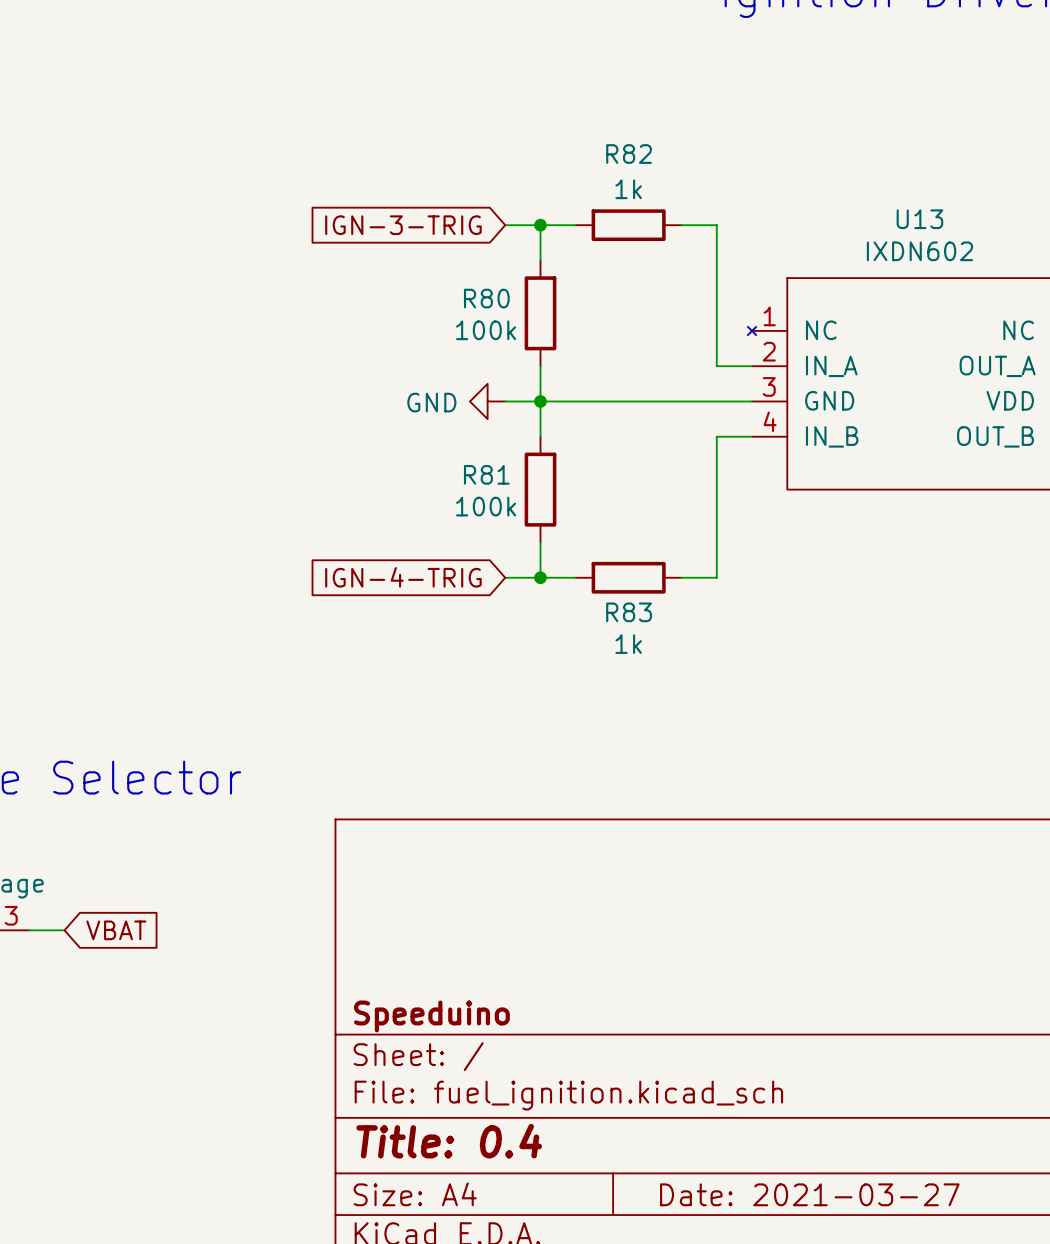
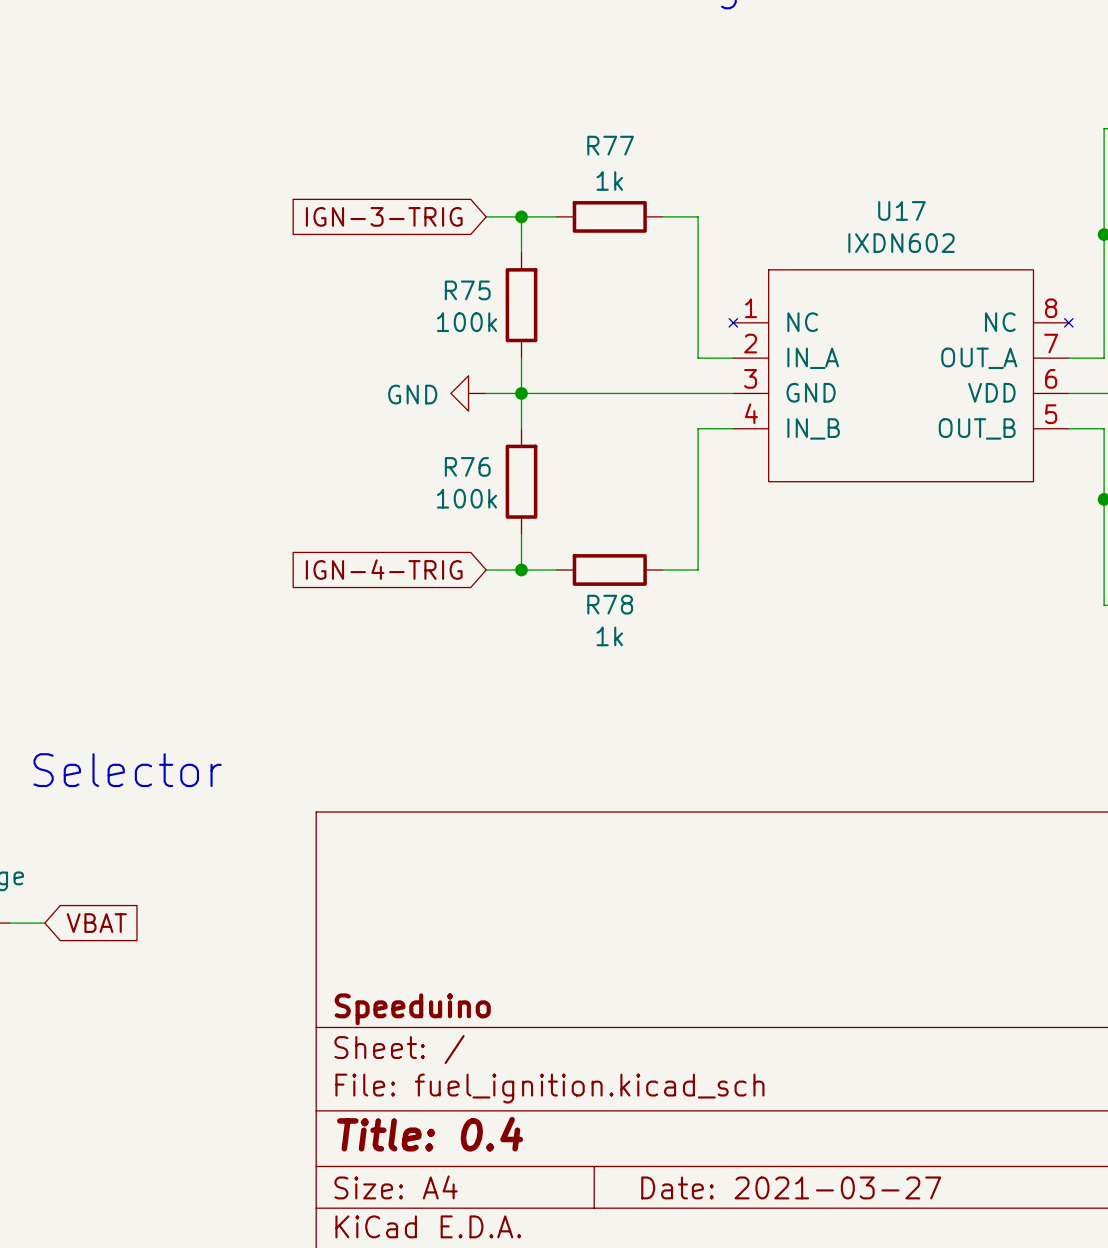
R82 name: R82 (629, 154) -> R77 (610, 145)
U13 name: U13 (919, 219) -> U17 (901, 210)
R80 name: R80 (486, 298) -> R75 (467, 290)
R81 name: R81 (486, 474) -> R76 (467, 466)
R83 name: R83 (629, 612) -> R78 (610, 604)

